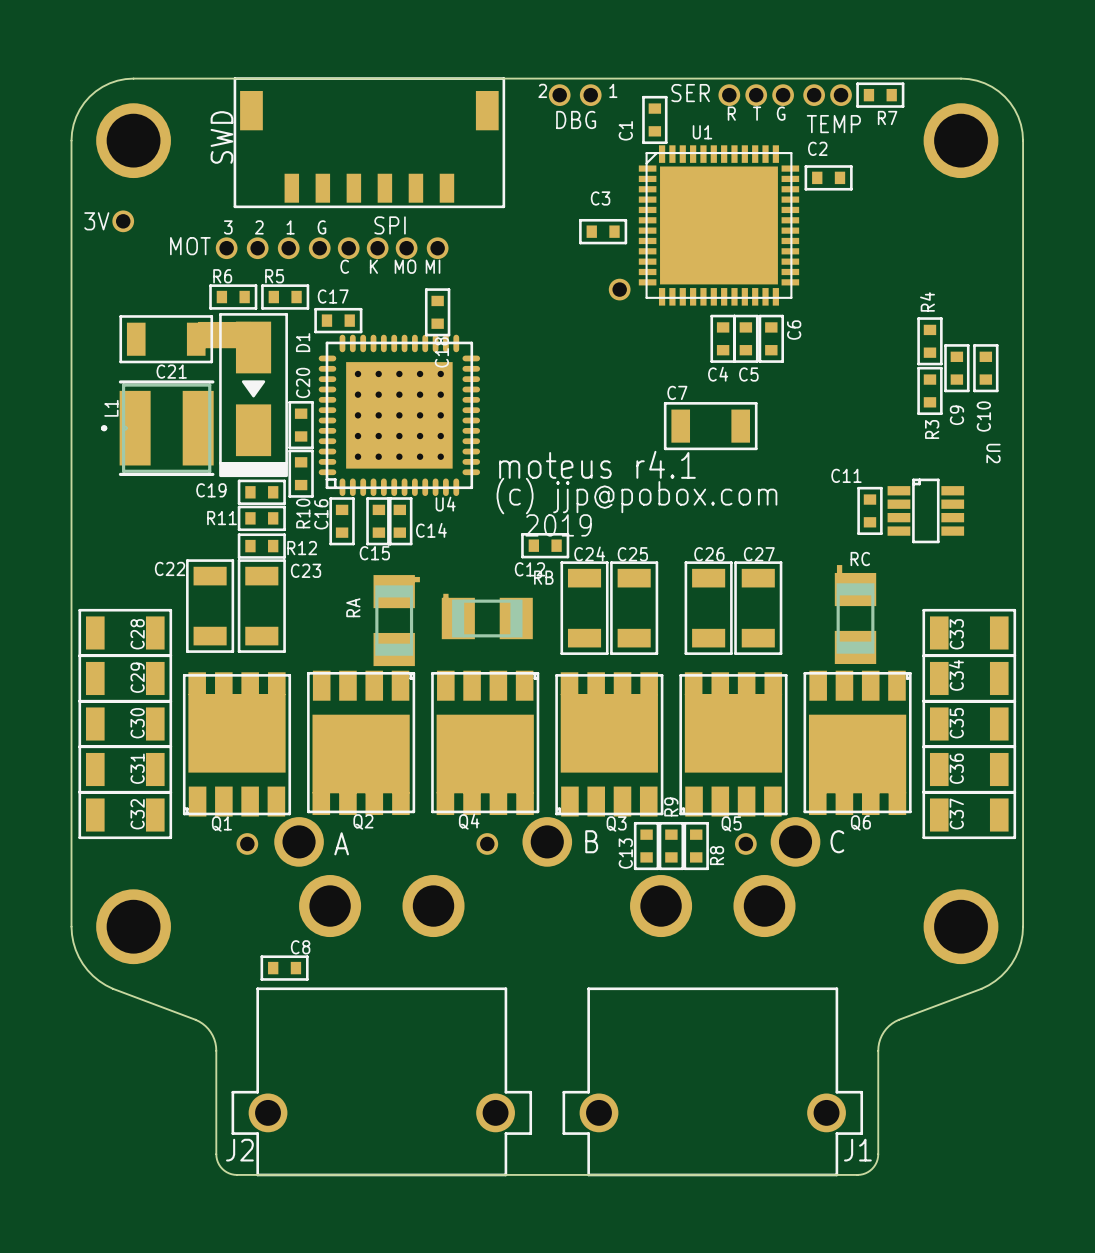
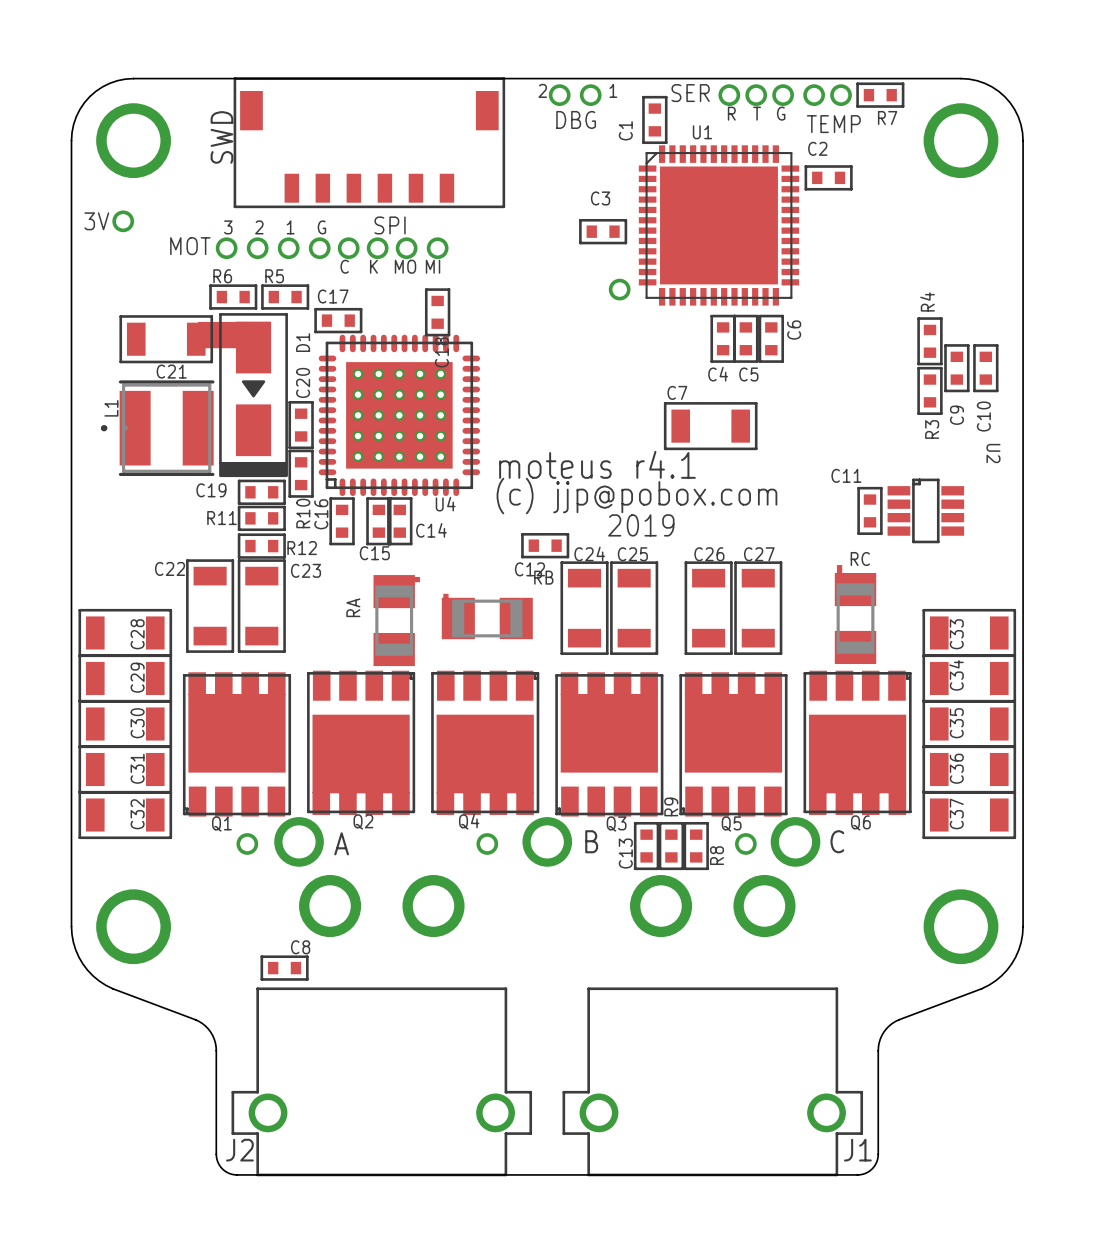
text position: 2019 (558, 525) -> 2019 (641, 525)

